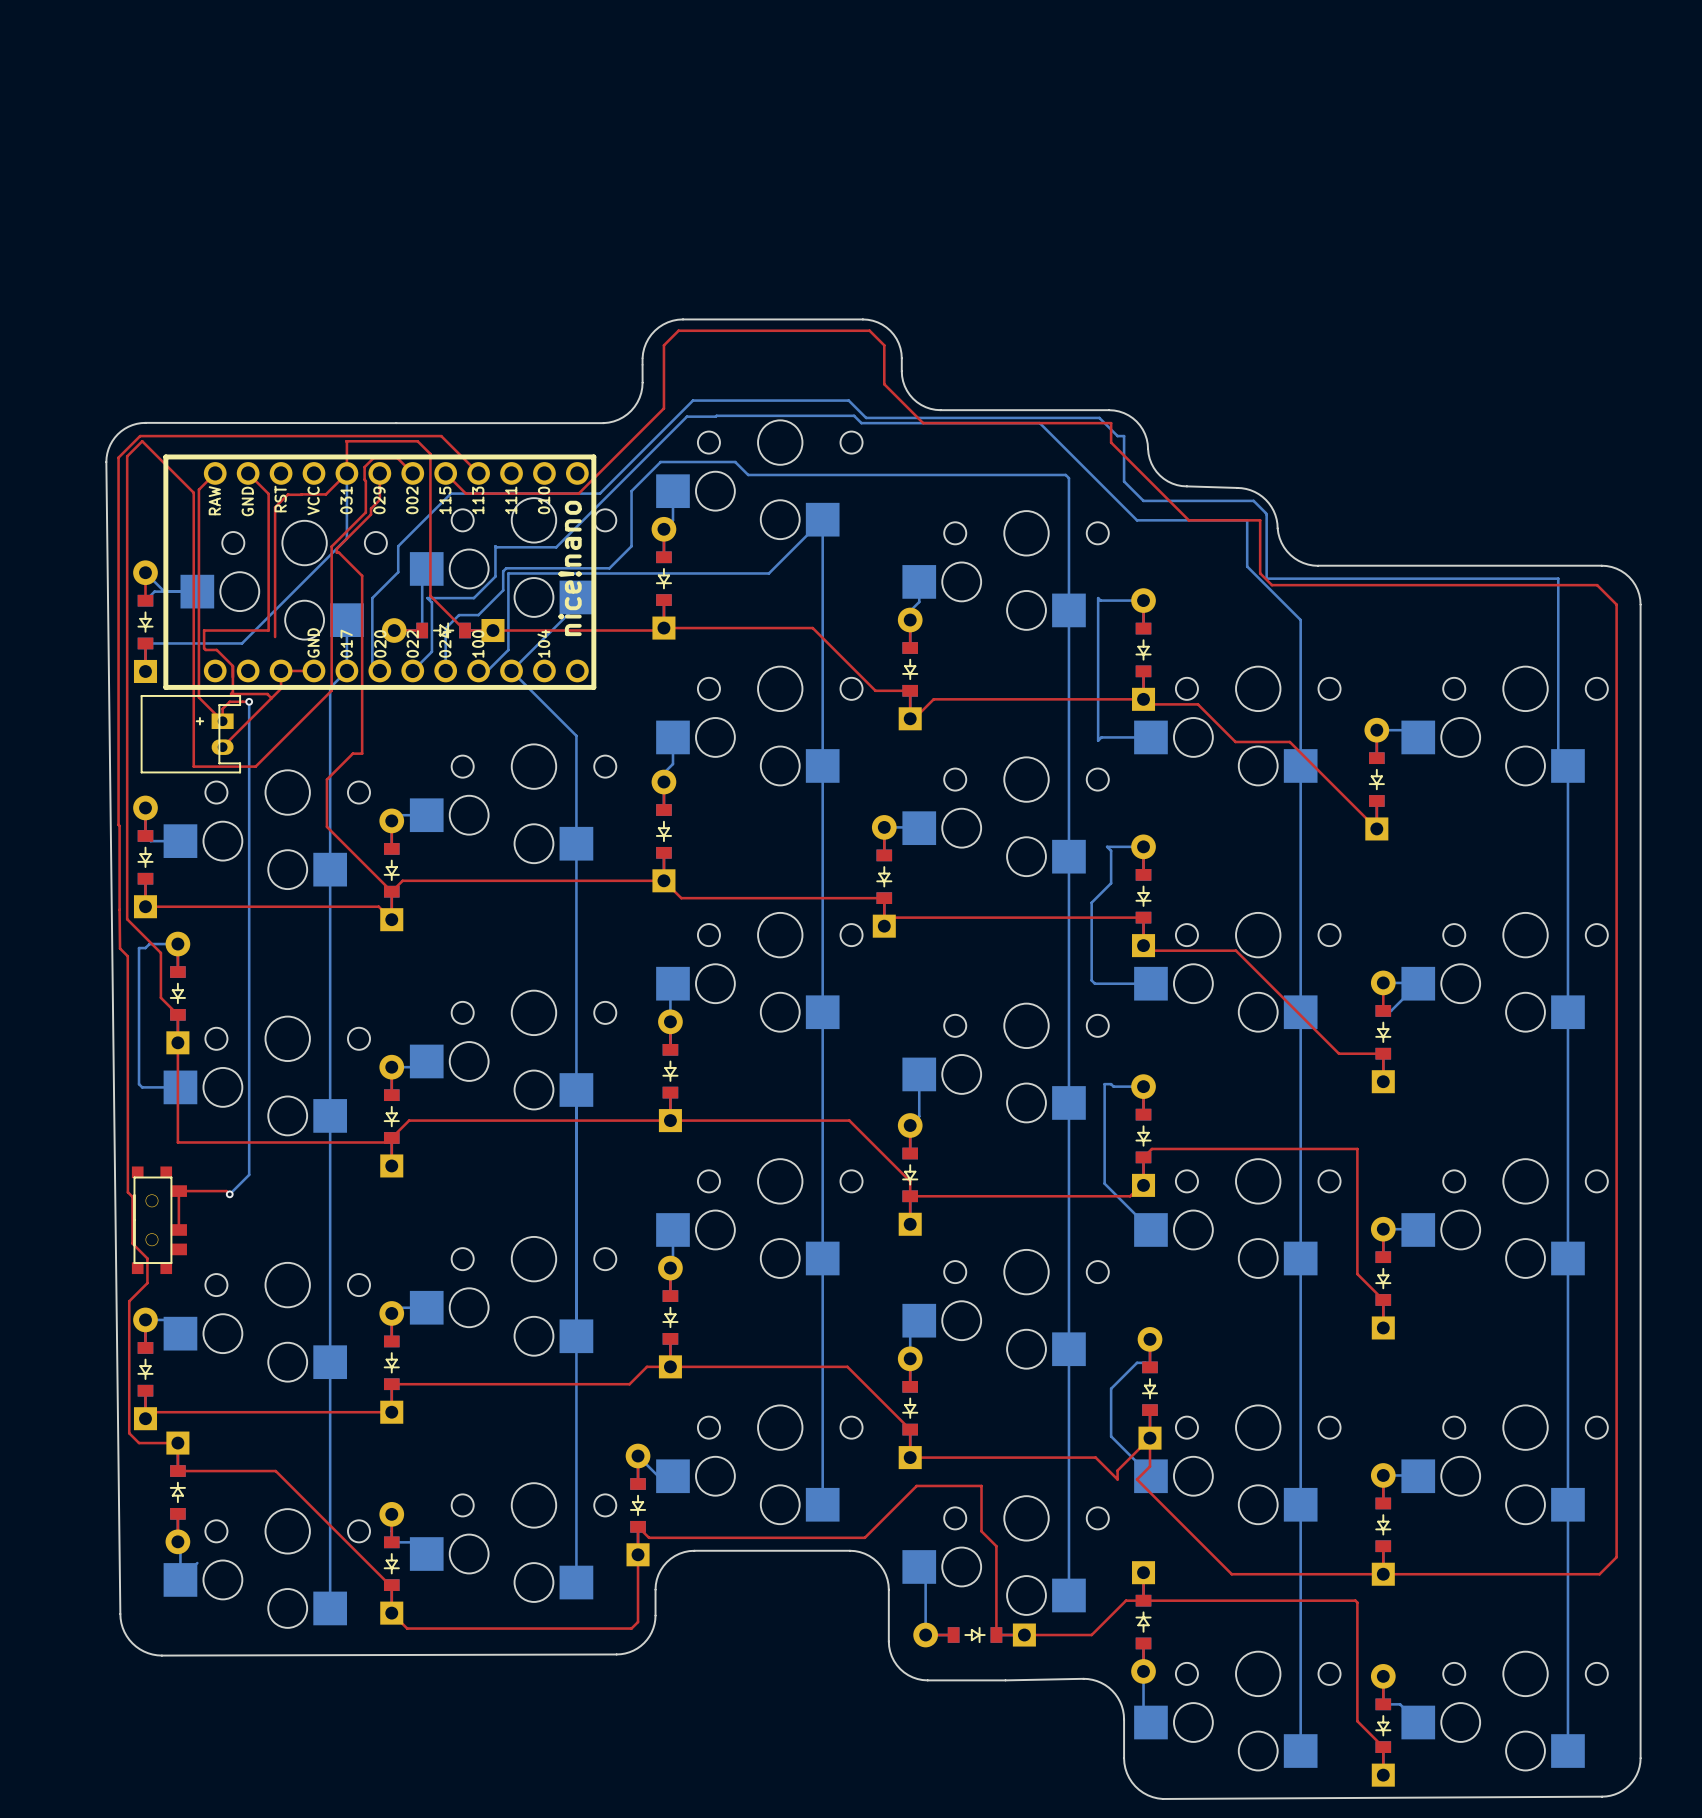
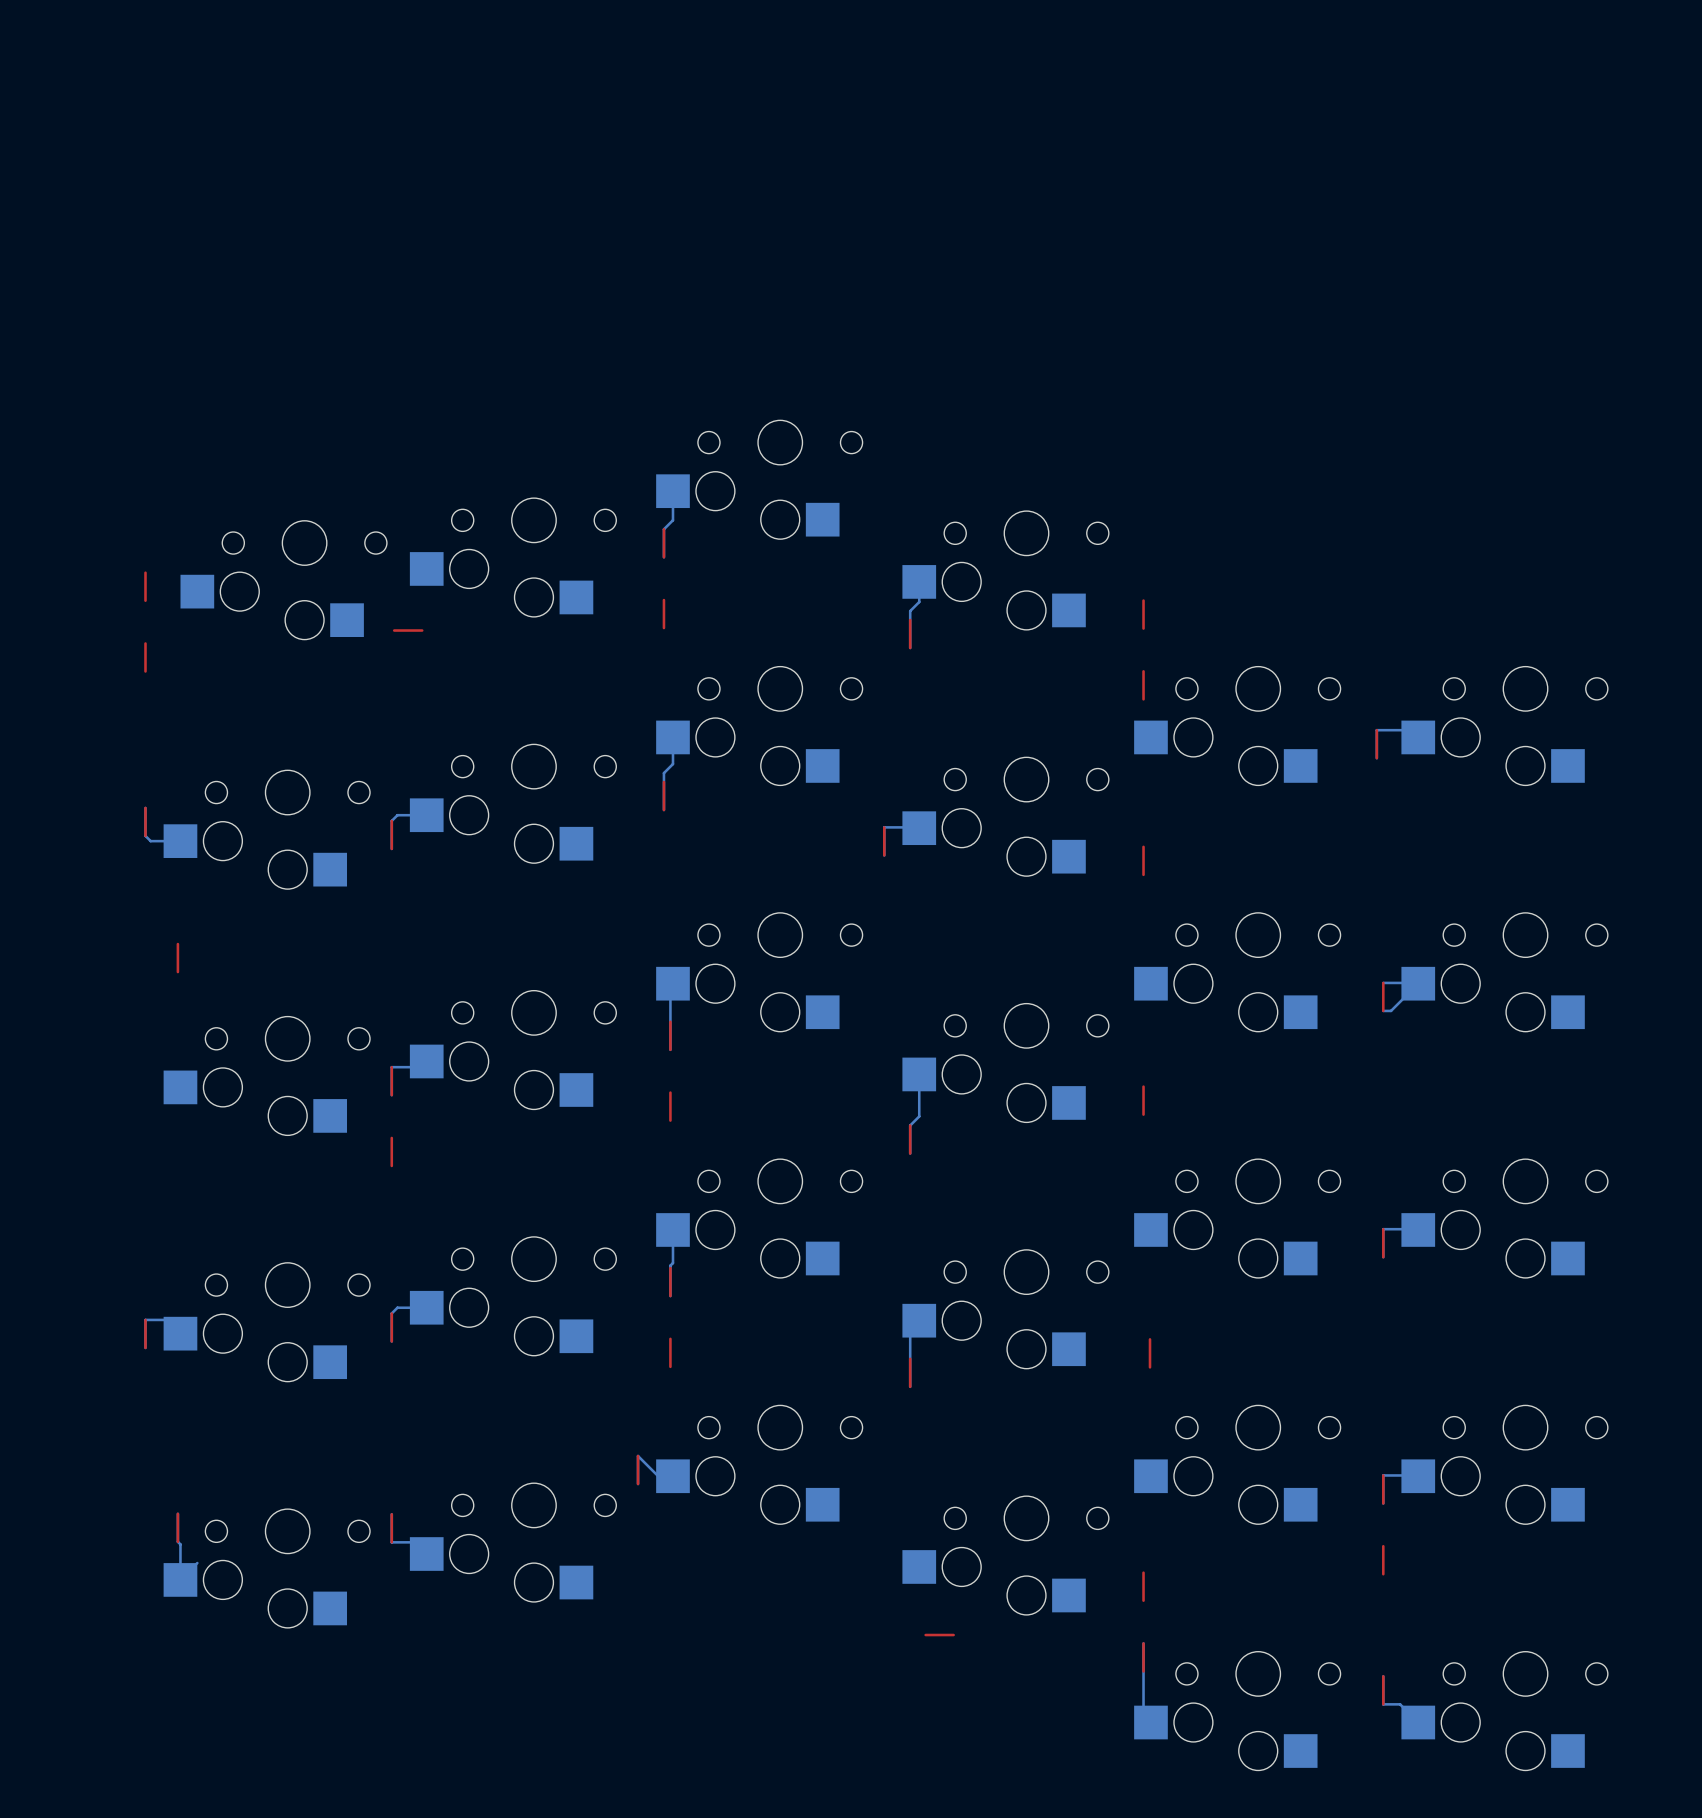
top track: (215, 473) (198, 489) (198, 697) (222, 721) -> none
top track: (248, 473) (268, 493) (268, 630) (204, 630) (204, 648) (216, 649) (232, 666) (232, 692) (231, 694) (267, 694) (271, 698) -> none
bottom track: (346, 473) (346, 538) (241, 643) (145, 643) (145, 671) -> none
top track: (379, 473) (379, 499) (371, 508) (371, 514) (336, 548) (336, 552) (362, 575) (362, 753) (352, 753) (326, 779) (326, 826) (391, 891) -> none
top track: (412, 473) (397, 458) (373, 458) (364, 467) (365, 512) (331, 546) (331, 690) (255, 766) (193, 766) (193, 492) (142, 441) (127, 456) (127, 919) (160, 952) (160, 997) (177, 1014) (177, 1142) (387, 1142) (409, 1120) (849, 1120) (910, 1181) (910, 1224) -> none
top track: (445, 473) (465, 493) (578, 493) (663, 408) (663, 345) (678, 330) (869, 330) (884, 345) (884, 384) (923, 423) (1111, 423) (1111, 442) (1188, 520) (1260, 520) (1260, 573) (1271, 585) (1597, 585) (1616, 604) (1616, 1557) (1599, 1574) (1231, 1574) (1137, 1479) (1150, 1466) (1150, 1410) -> none
top track: (478, 473) (441, 436) (140, 436) (118, 457) (120, 948) (127, 956) (127, 1192) (132, 1196) (132, 1243) (147, 1258) (147, 1283) (129, 1301) (129, 1433) (139, 1443) (177, 1443) (177, 1471) (275, 1471) (391, 1585) (391, 1613) (407, 1628) (631, 1628) (638, 1622) (638, 1526) (649, 1537) (864, 1537) (916, 1485) (981, 1485) (981, 1531) (996, 1546) (996, 1635) (1091, 1635) (1126, 1600) (1355, 1600) (1357, 1602) (1357, 1721) (1383, 1747) (1383, 1775) -> none
board edge: (1318, 565) (1606, 566) (1625, 573) (1632, 580) (1639, 594) (1640, 1758) (1638, 1770) (1629, 1785) (1614, 1794) (1602, 1796) (1162, 1798) (1152, 1797) (1139, 1789) (1127, 1773) (1124, 1758) (1123, 1710) (1115, 1694) (1101, 1682) (1083, 1678) (927, 1680) (912, 1677) (904, 1672) (894, 1660) (889, 1646) (888, 1589) (885, 1574) (873, 1558) (855, 1551) (694, 1550) (679, 1553) (666, 1562) (658, 1574) (655, 1584) (655, 1619) (649, 1636) (637, 1648) (620, 1654) (161, 1655) (143, 1651) (132, 1643) (122, 1627) (120, 1614) (106, 462) (110, 445) (117, 434) (128, 426) (145, 422) (608, 422) (623, 417) (637, 402) (642, 387) (642, 358) (646, 343) (654, 330) (667, 322) (683, 319) (867, 319) (882, 324) (896, 338) (901, 353) (902, 376) (904, 386) (909, 394) (921, 404) (940, 410) (1109, 410) (1124, 413) (1136, 421) (1142, 429) (1151, 463) (1163, 478) (1181, 486) (1241, 488) (1258, 494) (1265, 499) (1273, 510) (1279, 538) (1287, 551) (1303, 563) (1318, 565) -> none
bottom track: (426, 568) (422, 573) (422, 630) (394, 630) -> none
bottom track: (145, 572) (164, 591) -> none
part: (379, 572) -> none
part: (663, 578) -> none
bottom track: (197, 591) (154, 591) (145, 600) -> none
bottom track: (576, 597) (576, 606) (511, 670) (576, 735) (576, 1582) -> none
bottom track: (346, 620) (346, 670) (330, 687) (330, 1608) -> none
part: (145, 621) -> none
bottom track: (1143, 628) (1143, 600) (1100, 600) (1098, 598) (1098, 740) (1101, 737) (1150, 737) -> none
part: (443, 630) -> none
top track: (275, 637) (275, 507) (288, 494) (325, 494) (346, 473) (346, 441) (417, 441) (430, 454) (430, 595) (464, 630) (812, 628) (875, 690) (910, 690) (910, 718) (914, 718) (933, 699) (1143, 699) (1148, 704) (1197, 704) (1235, 741) (1289, 741) (1376, 828) (1376, 800) -> none
part: (1143, 649) -> none
part: (910, 668) -> none
top track: (313, 670) (281, 670) (281, 688) (222, 747) -> none
bottom track: (386, 670) (379, 670) (372, 663) (372, 598) (398, 572) (398, 546) (450, 493) (599, 493) (693, 400) (848, 400) (866, 417) (1099, 417) (1117, 436) (1124, 436) (1124, 481) (1143, 500) (1253, 500) (1266, 514) (1266, 578) (1558, 578) (1558, 756) (1567, 765) -> none
bottom track: (416, 670) (412, 670) (431, 651) (431, 602) (427, 598) (473, 598) (495, 576) (495, 546) (556, 547) (686, 416) (854, 415) (861, 423) (1039, 423) (1137, 520) (1247, 520) (1247, 566) (1300, 620) (1300, 1751) -> none
bottom track: (445, 670) (445, 628) (459, 615) (478, 615) (503, 590) (503, 571) (506, 568) (609, 568) (631, 546) (631, 491) (660, 462) (735, 462) (748, 474) (1065, 474) (1068, 478) (1068, 1595) -> none
bottom track: (478, 670) (487, 670) (508, 649) (508, 573) (768, 573) (822, 519) (822, 1504) -> none
bottom track: (249, 701) (249, 1174) (229, 1194) -> none
top track: (249, 701) (229, 701) (222, 708) (222, 721) -> none
via: (249, 701) -> none
part: (190, 734) -> none
bottom track: (1567, 765) (1567, 1751) -> none
part: (1376, 779) -> none
part: (663, 831) -> none
top track: (663, 852) (663, 880) -> none
part: (145, 856) -> none
part: (391, 869) -> none
bottom track: (1143, 874) (1143, 846) (1107, 846) (1111, 850) (1111, 883) (1091, 902) (1091, 980) (1094, 983) (1150, 983) -> none
part: (884, 876) -> none
top track: (145, 878) (145, 906) (378, 906) (391, 919) (391, 891) -> none
top track: (663, 880) (681, 898) (884, 898) (884, 926) (892, 917) (1143, 917) (1143, 945) (1148, 950) (1235, 950) (1338, 1053) (1383, 1053) (1383, 1081) -> none
top track: (663, 880) (402, 880) (391, 891) -> none
part: (1143, 895) -> none
bottom track: (177, 972) (177, 944) (149, 944) (145, 948) (139, 948) (139, 1084) (142, 1087) (180, 1087) -> none
part: (177, 993) -> none
part: (1383, 1031) -> none
part: (670, 1070) -> none
bottom track: (1143, 1114) (1143, 1086) (1113, 1086) (1111, 1084) (1104, 1084) (1104, 1183) (1150, 1229) -> none
part: (391, 1116) -> none
part: (1143, 1135) -> none
part: (910, 1174) -> none
top track: (229, 1194) (226, 1191) (178, 1191) (178, 1229) -> none
via: (229, 1194) -> none
top track: (910, 1196) (1130, 1196) (1141, 1185) (1143, 1185) (1143, 1157) (1151, 1148) (1357, 1148) (1357, 1274) (1383, 1299) (1383, 1327) -> none
part: (159, 1220) -> none
part: (1383, 1278) -> none
part: (670, 1317) -> none
bottom track: (1150, 1339) (1150, 1367) (1145, 1362) (1137, 1362) (1111, 1388) (1111, 1436) (1150, 1476) -> none
part: (391, 1362) -> none
part: (145, 1368) -> none
part: (1150, 1388) -> none
top track: (145, 1390) (145, 1418) (151, 1412) (391, 1412) (391, 1384) (629, 1384) (646, 1366) (847, 1366) (910, 1429) (910, 1457) (1095, 1457) (1117, 1479) (1117, 1470) (1150, 1438) -> none
part: (910, 1407) -> none
part: (177, 1492) -> none
part: (638, 1505) -> none
part: (1383, 1524) -> none
part: (391, 1563) -> none
bottom track: (919, 1566) (925, 1573) (925, 1635) (953, 1635) -> none
part: (1143, 1622) -> none
part: (974, 1635) -> none
part: (1383, 1725) -> none

